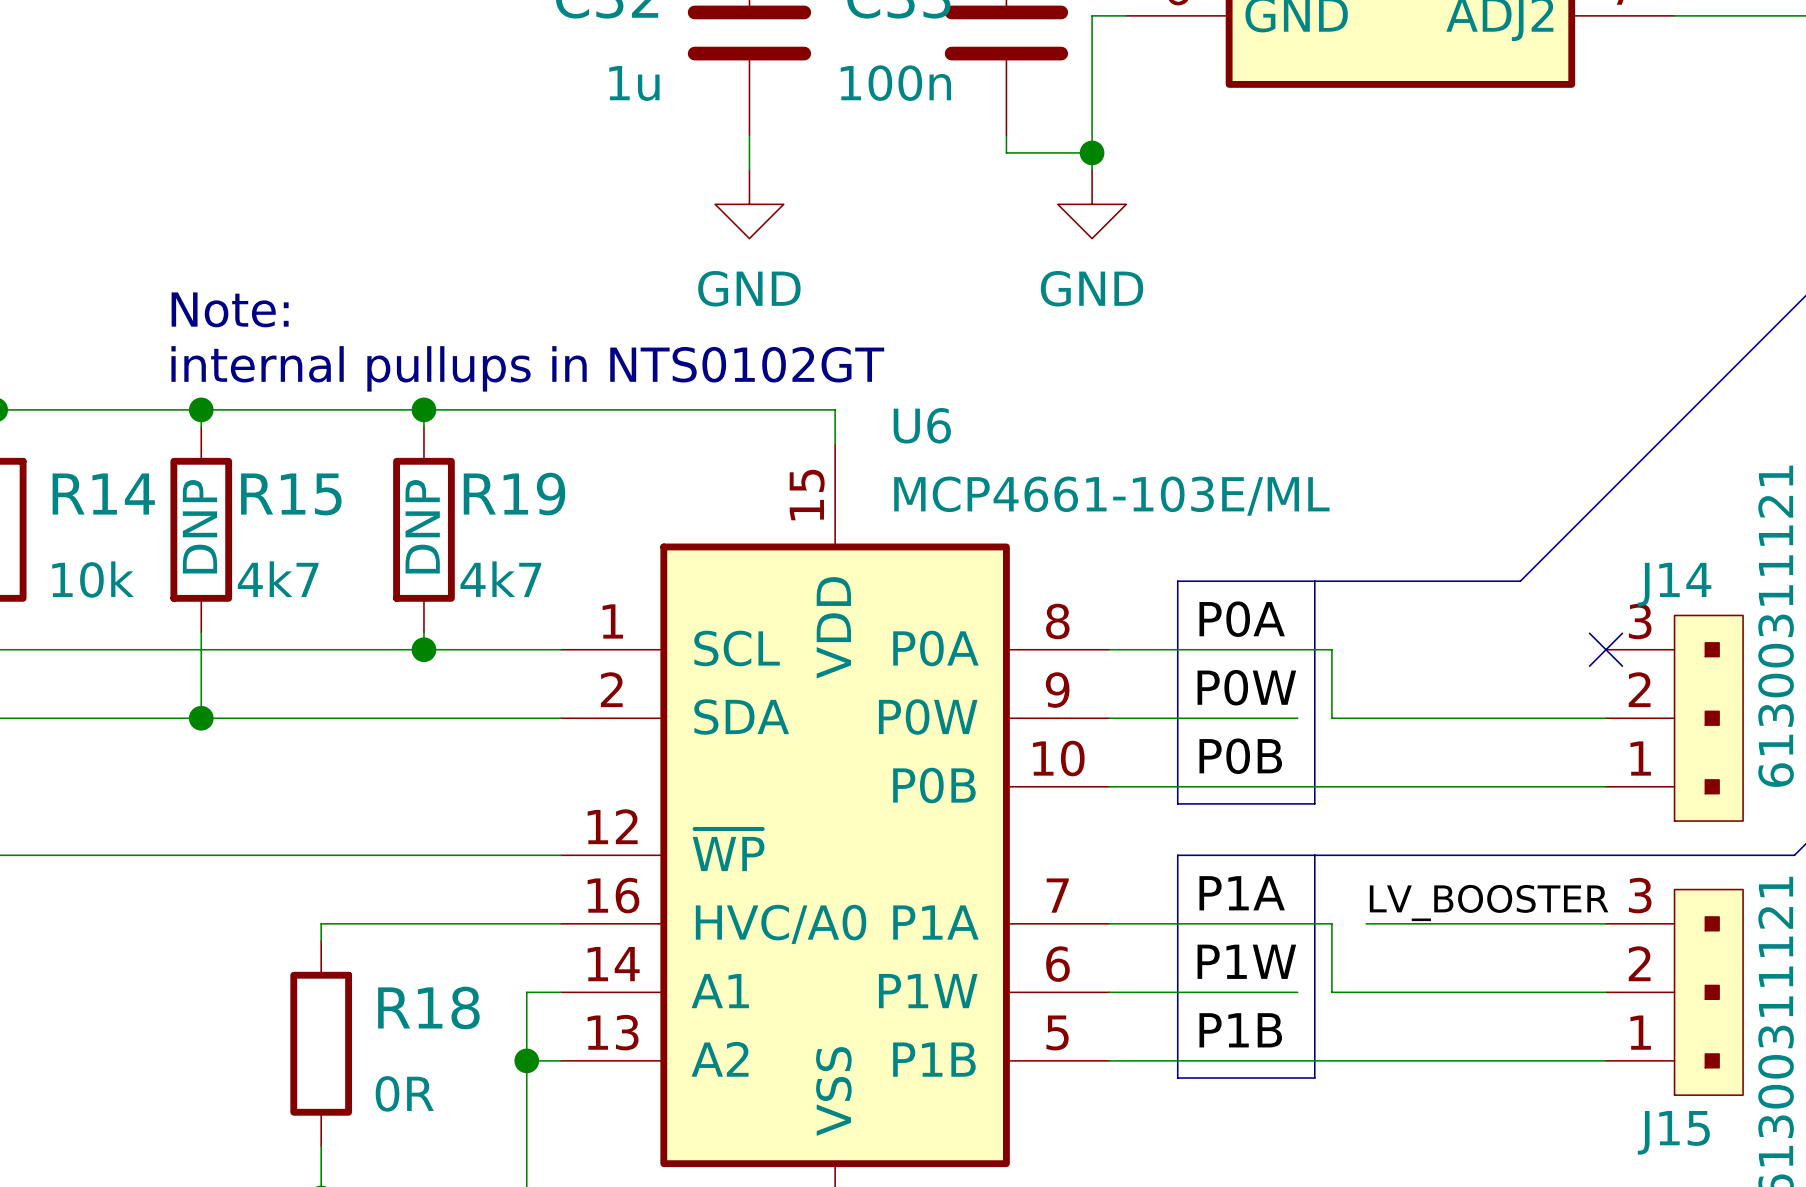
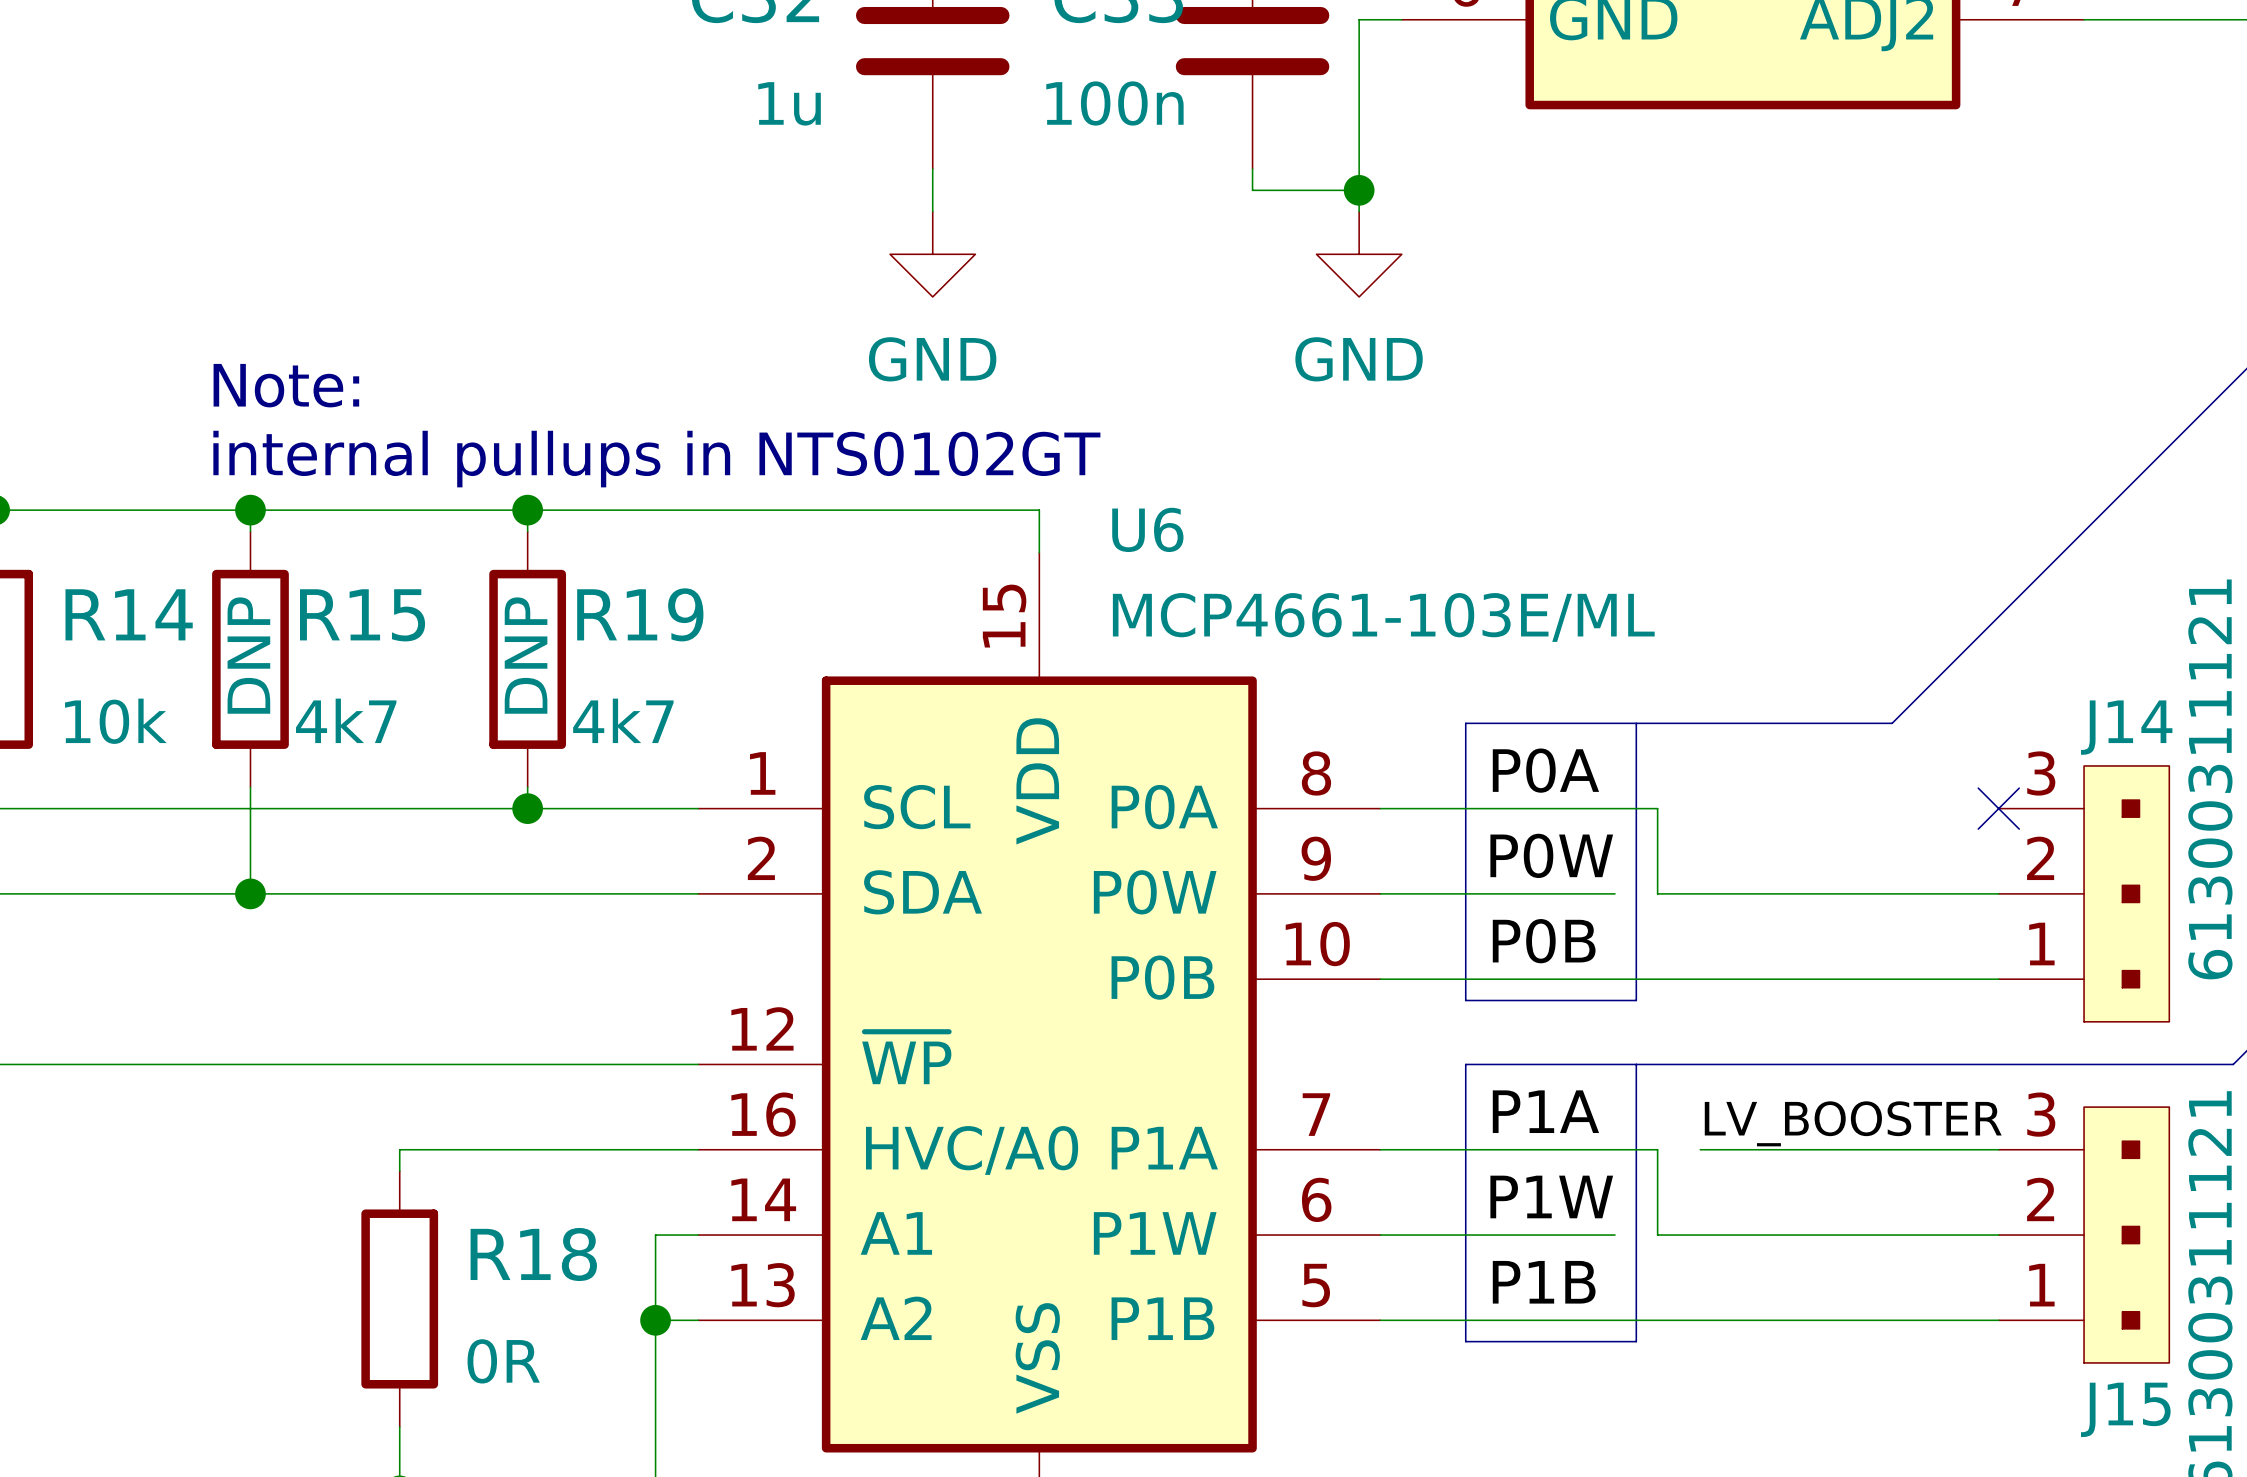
J14 name position: J14 (1674, 584) -> J14 (2126, 727)
J15 name position: J15 (1673, 1132) -> J15 (2125, 1409)

